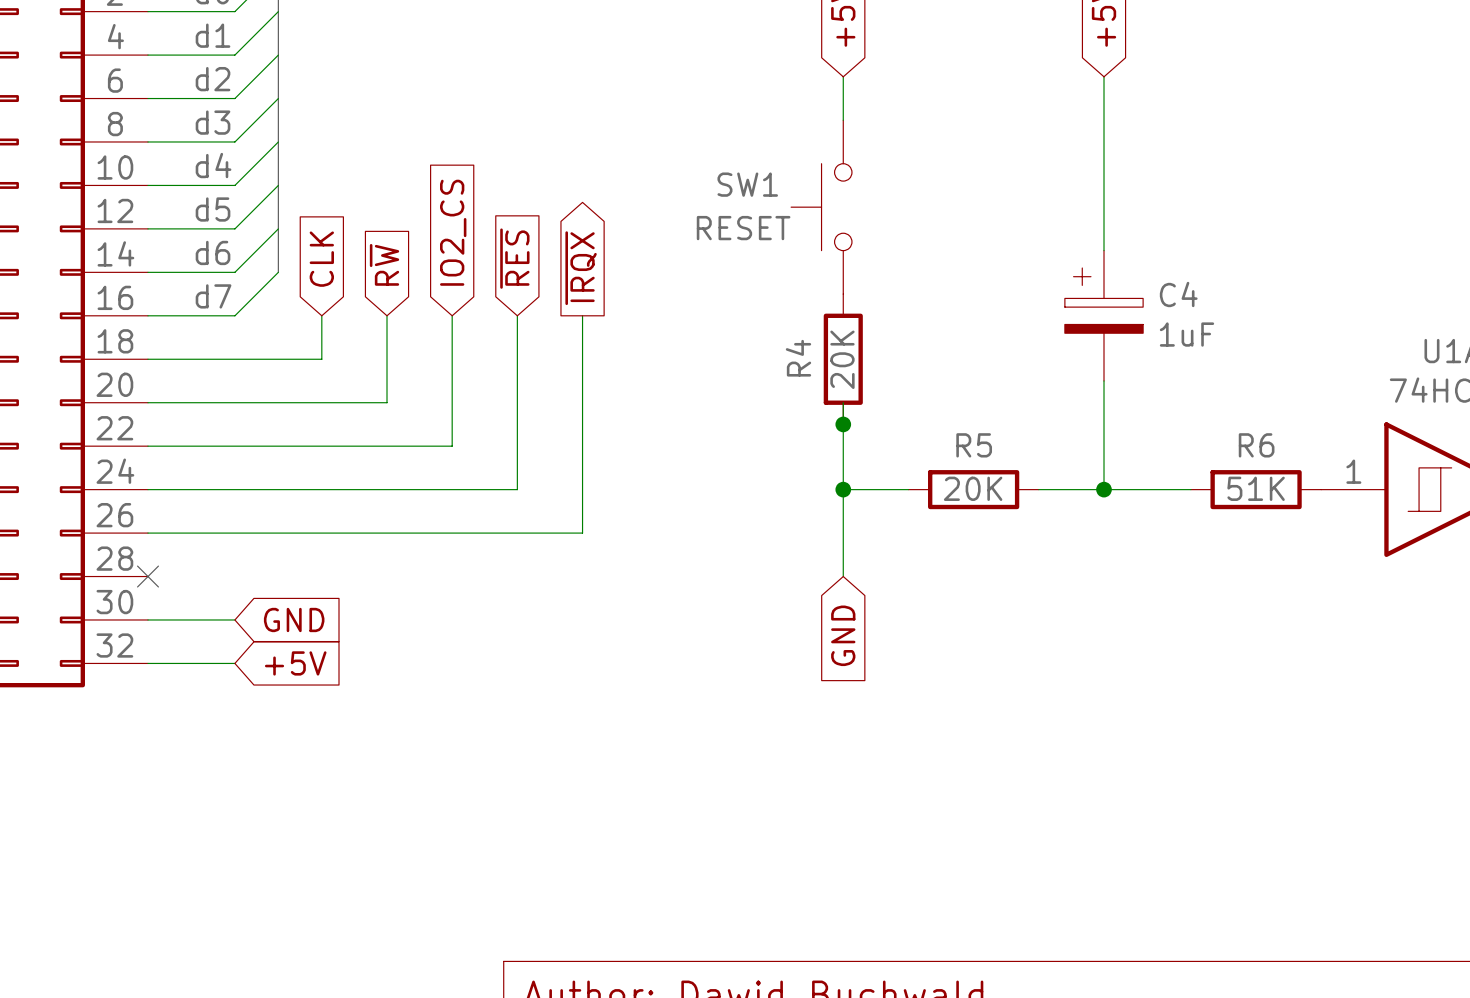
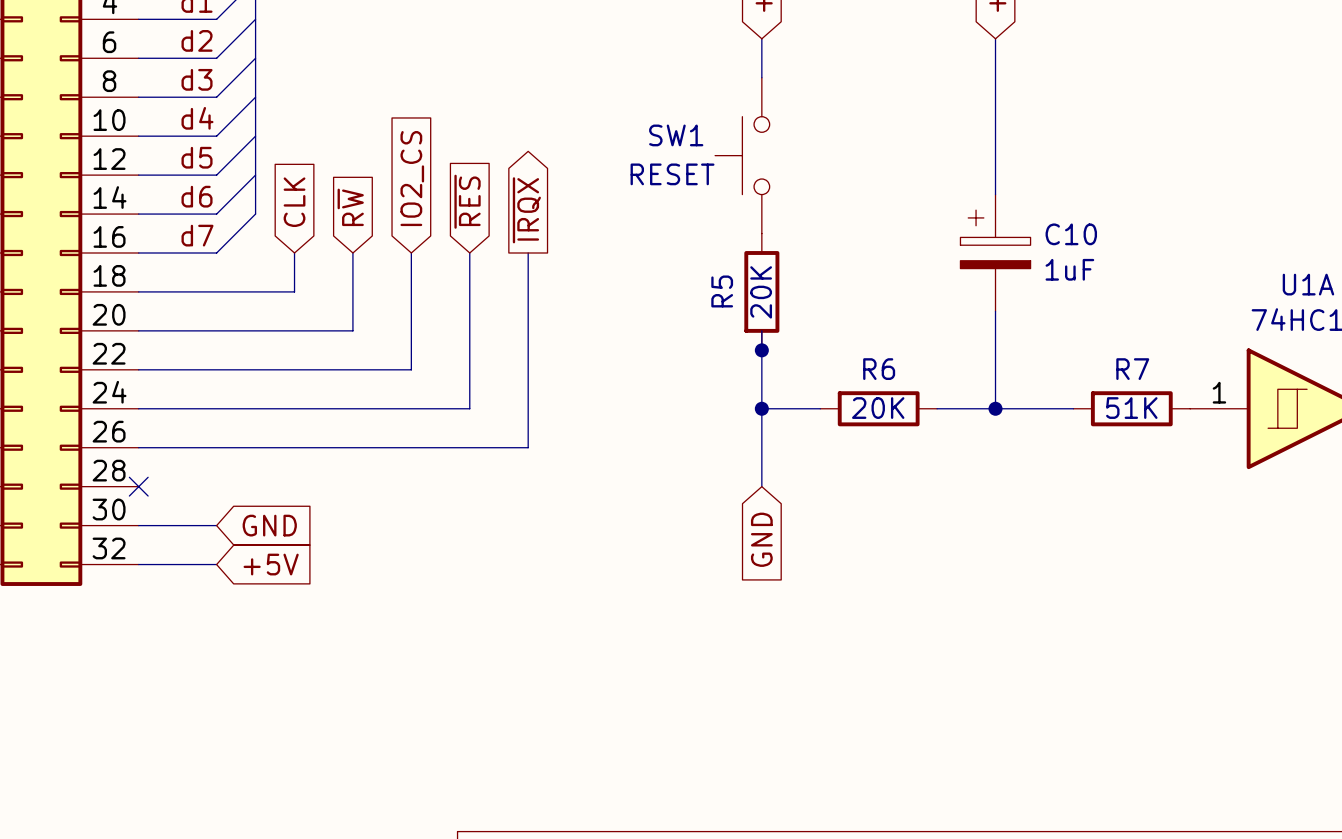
C4 name: C4 (1178, 294) -> C10 (1071, 234)
R4 name: R4 (798, 358) -> R5 (722, 291)
R5 name: R5 (974, 445) -> R6 (879, 369)
R6 name: R6 (1256, 445) -> R7 (1132, 369)

